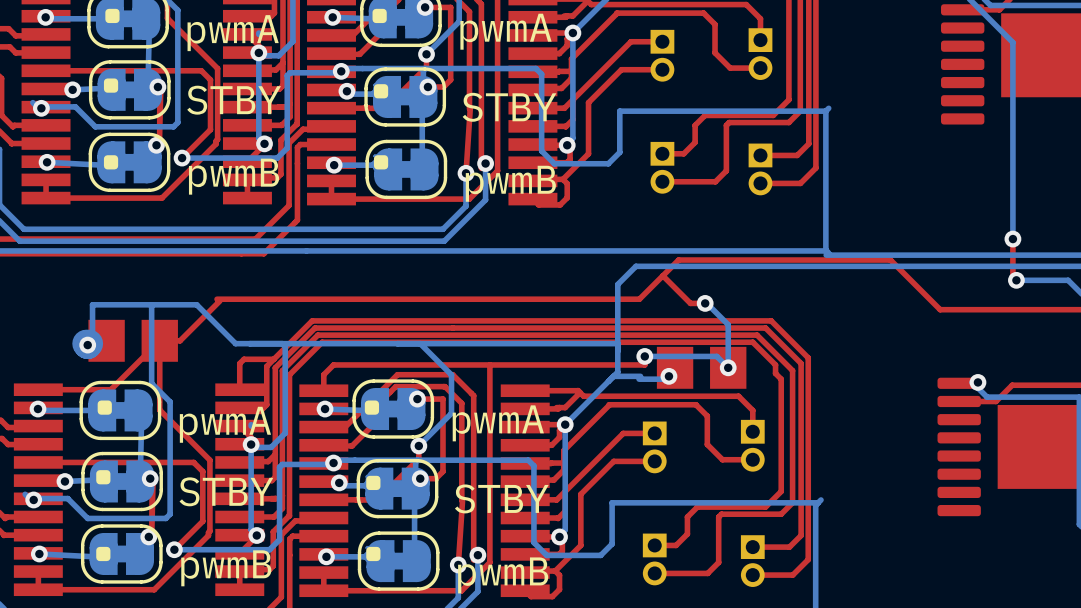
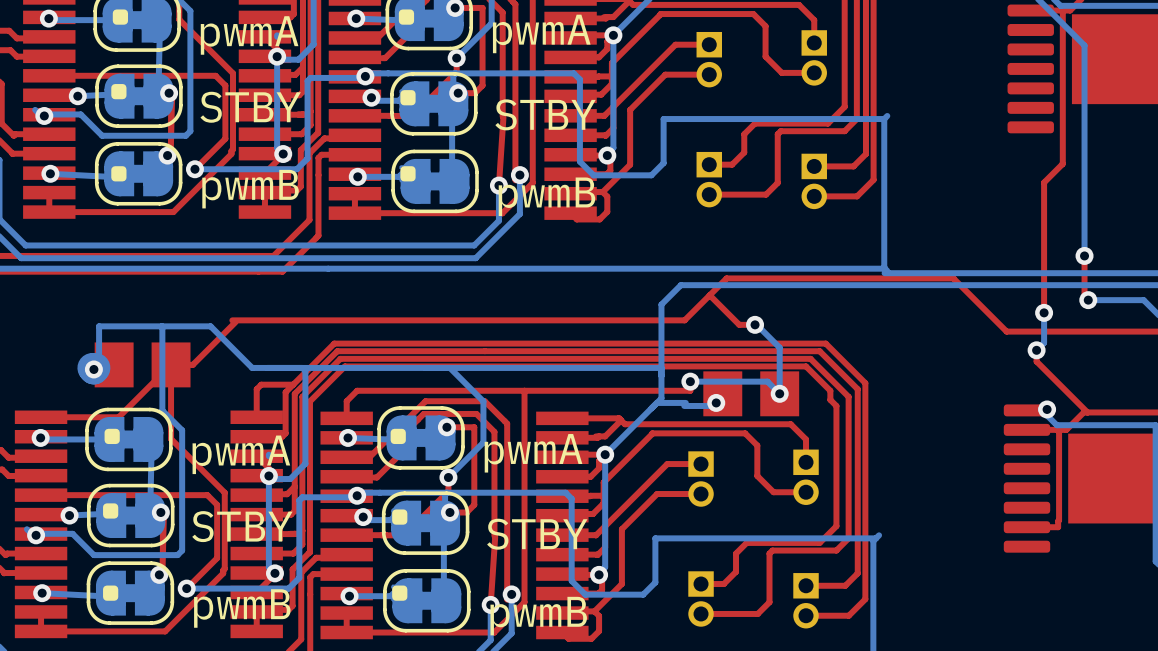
top track: none -> (1062, 10) (1062, 163) (1044, 182) (1044, 314)
bottom track: none -> (1044, 312) (1044, 342) (1036, 350)
via: none -> (1044, 312)
top track: none -> (1036, 350) (1036, 361) (1087, 412)
via: none -> (1036, 350)
top track: none -> (1057, 429) (1058, 527) (1027, 527)

